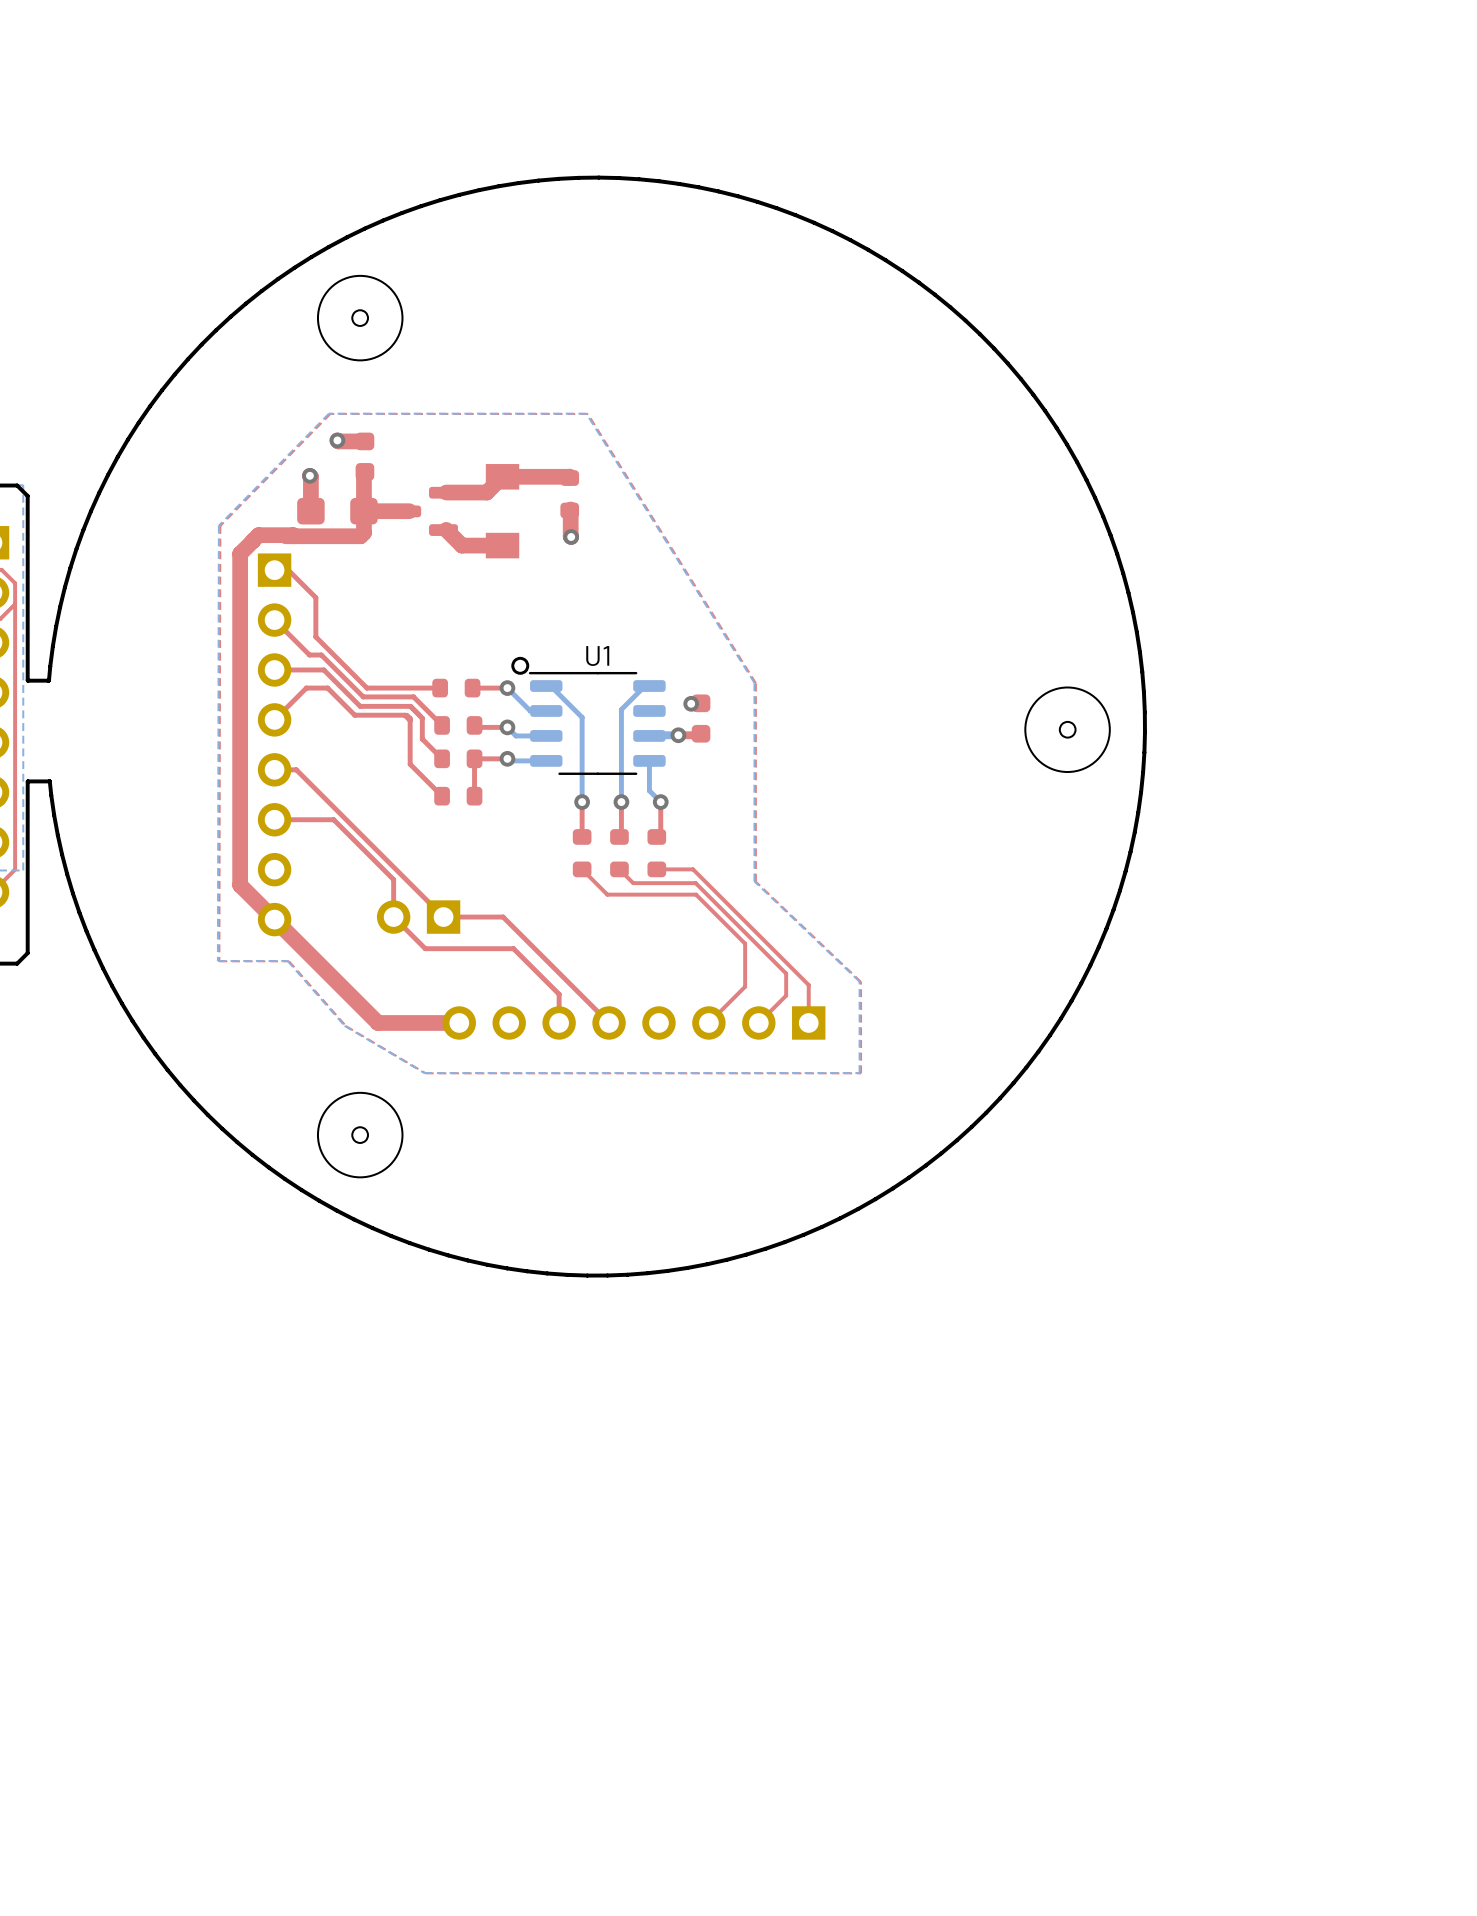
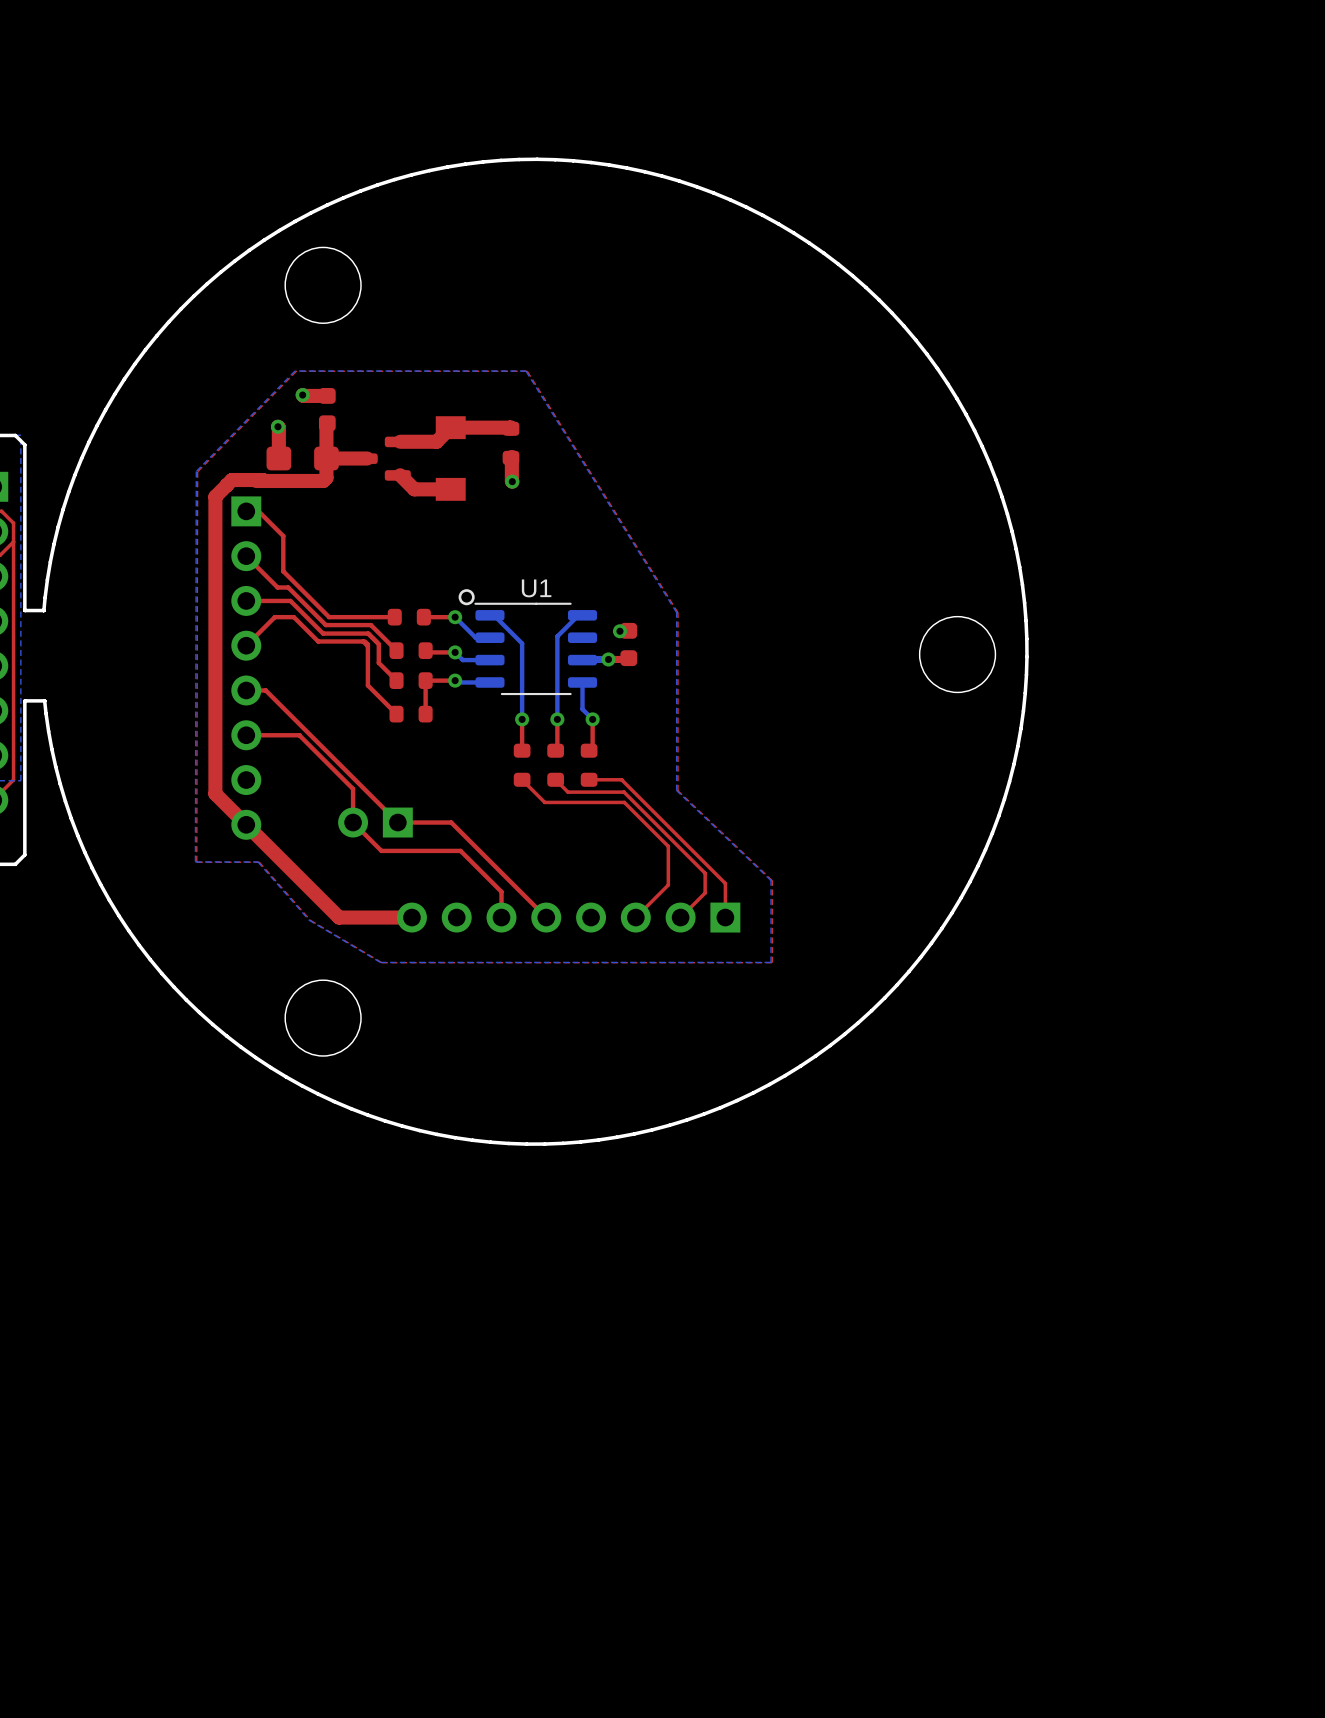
round board edge: [351, 309, 369, 327] -> none
round board edge: [1058, 720, 1077, 739] -> none
round board edge: [351, 1126, 369, 1144] -> none

